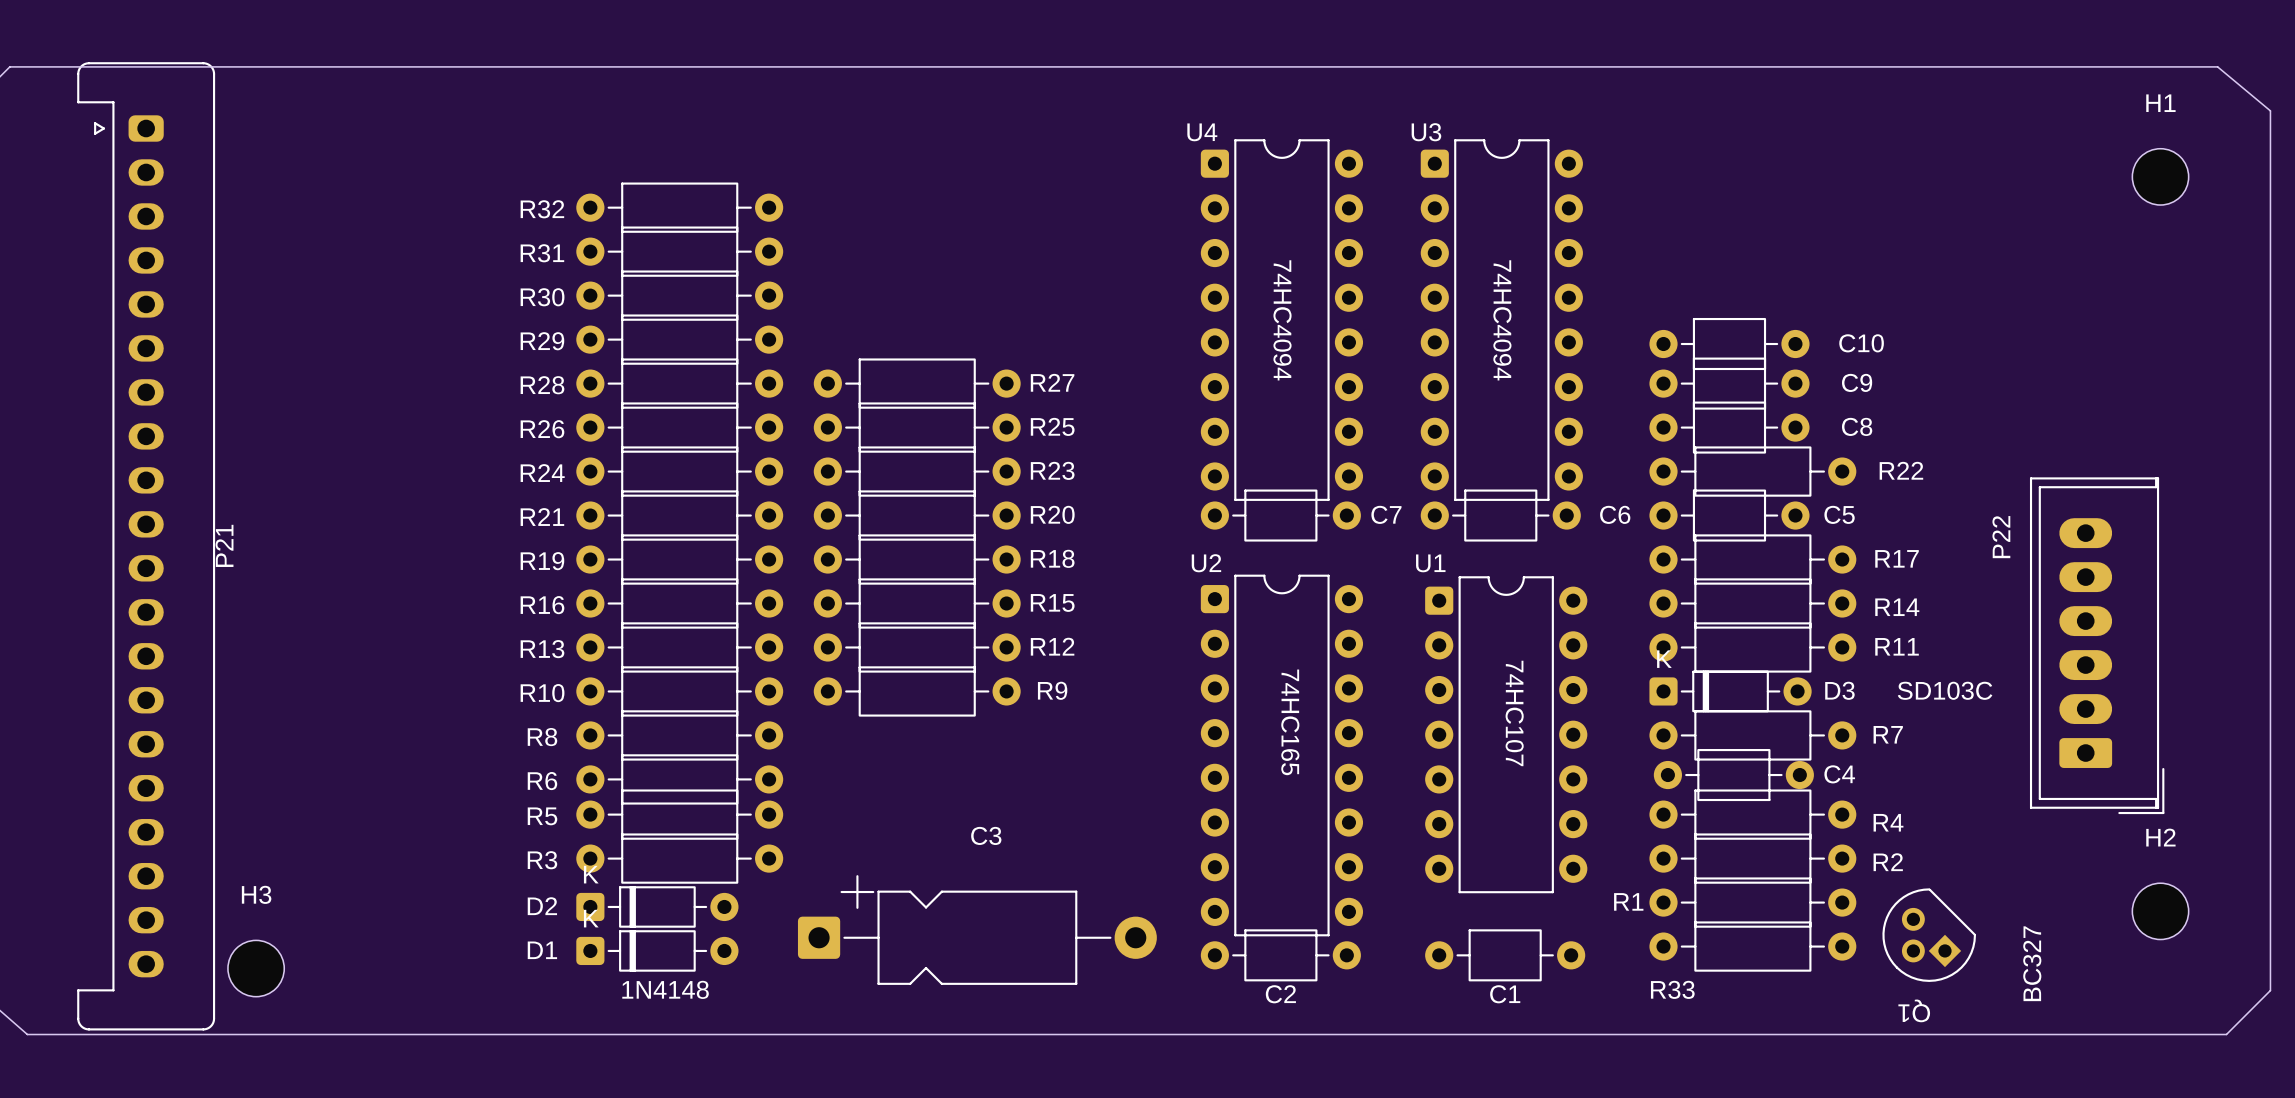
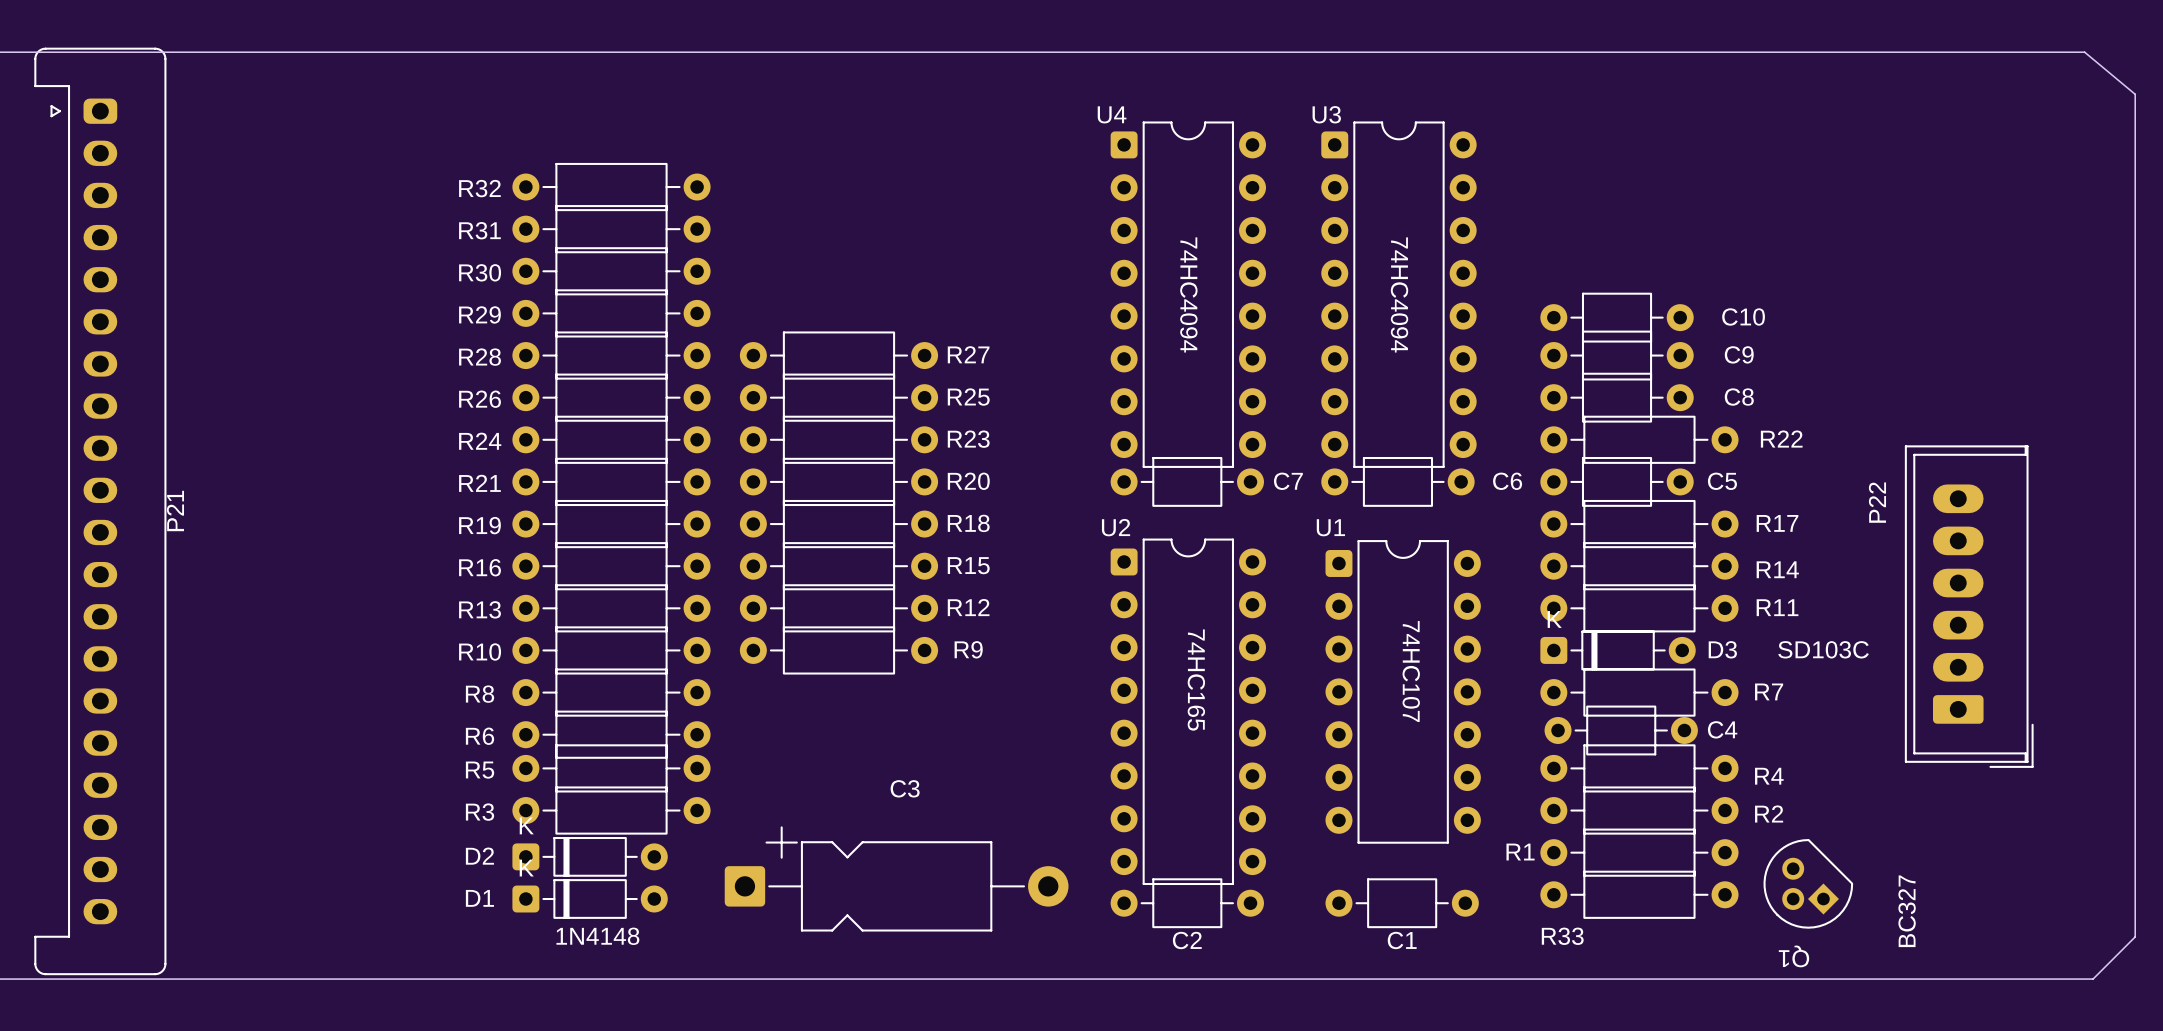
H1: (2160, 176) -> none
H2: (2160, 911) -> none
H3: (256, 968) -> none

